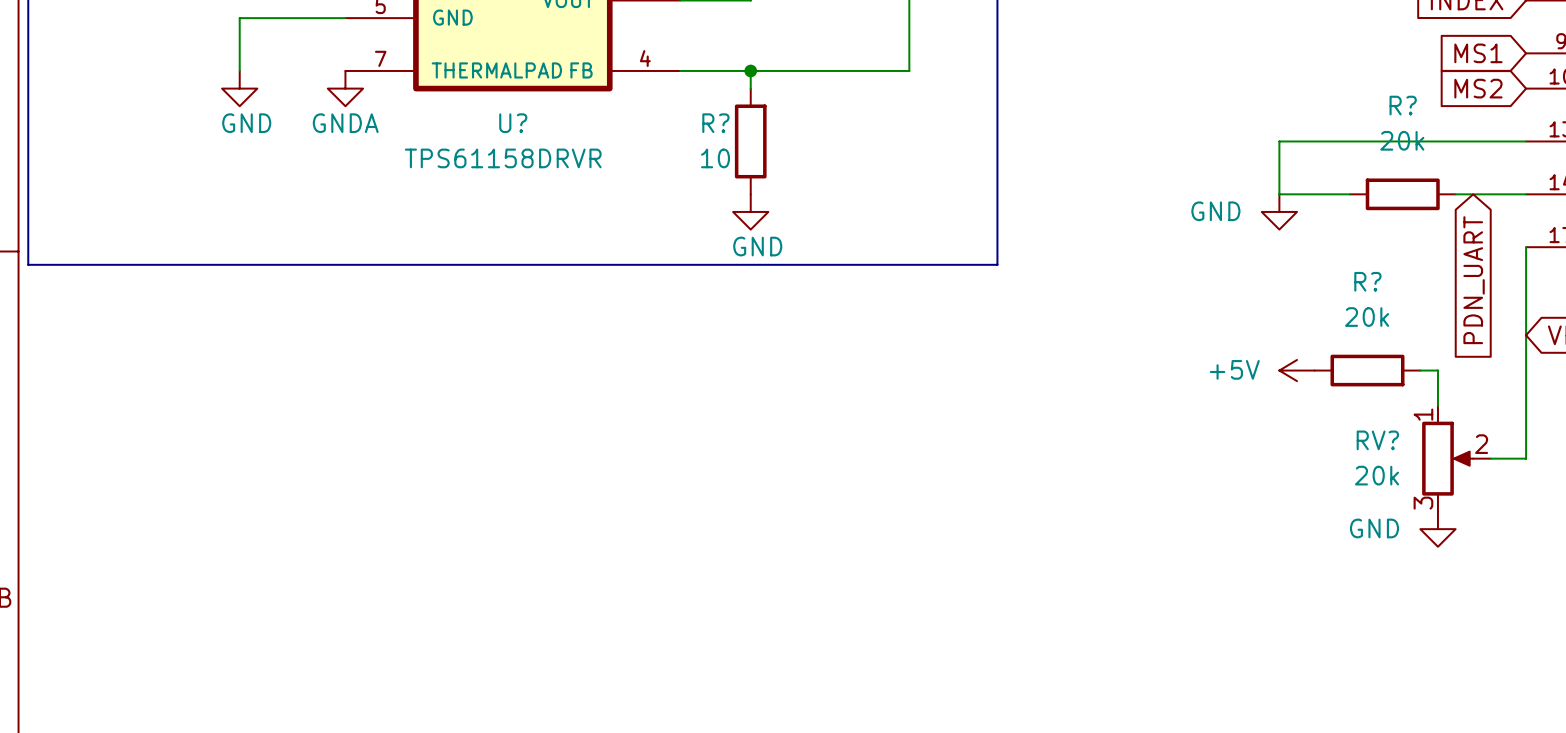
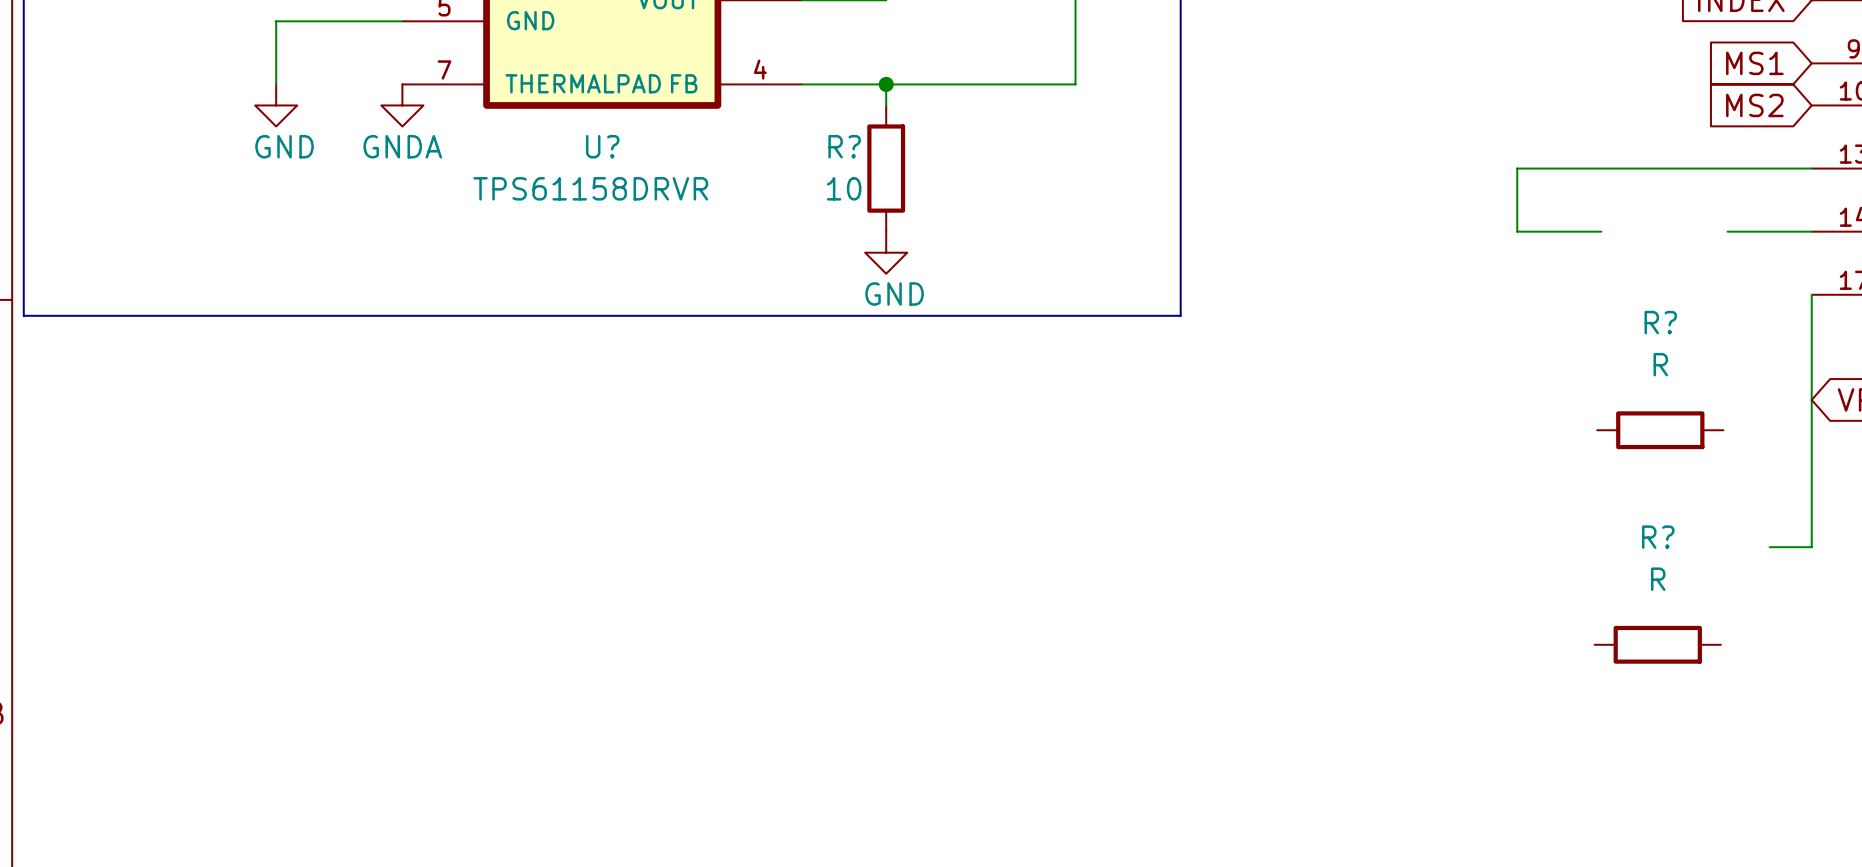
R?: 20k (1402, 194) -> none
power symbol: GND (1279, 211) -> none
global label: PDN_UART (1474, 280) -> none
R?: none -> R (1660, 430)
power symbol: +5V (1297, 370) -> none
R?: 20k (1367, 370) -> none
wire: (1420, 370) (1437, 370) (1437, 405) -> none
RV?: 20k (1456, 458) -> none
power symbol: GND (1437, 529) -> none
R?: none -> R (1657, 644)

